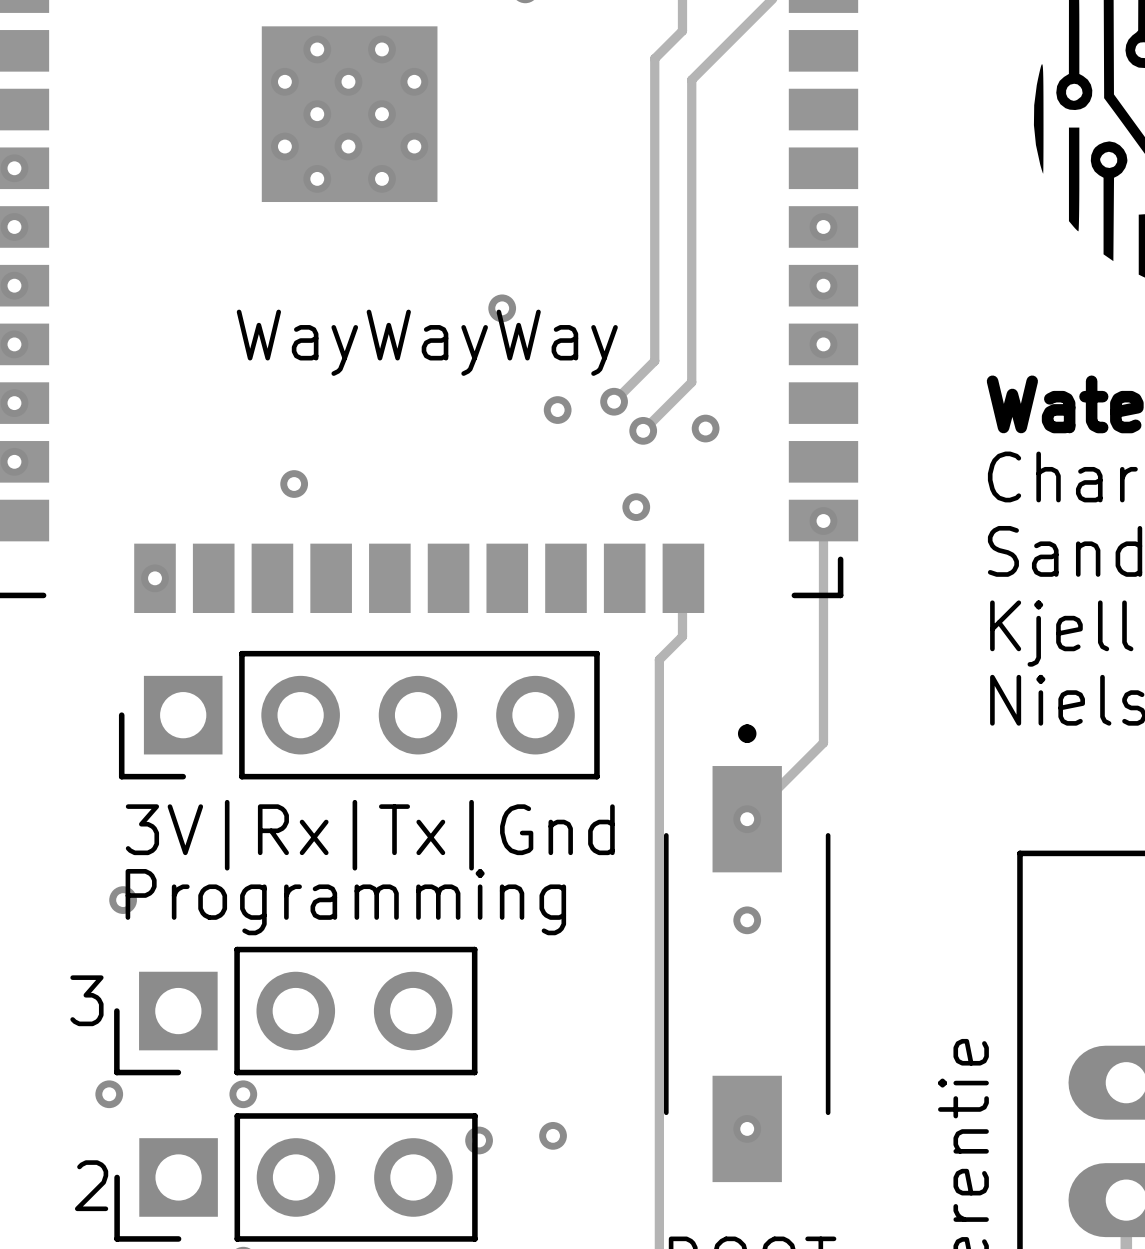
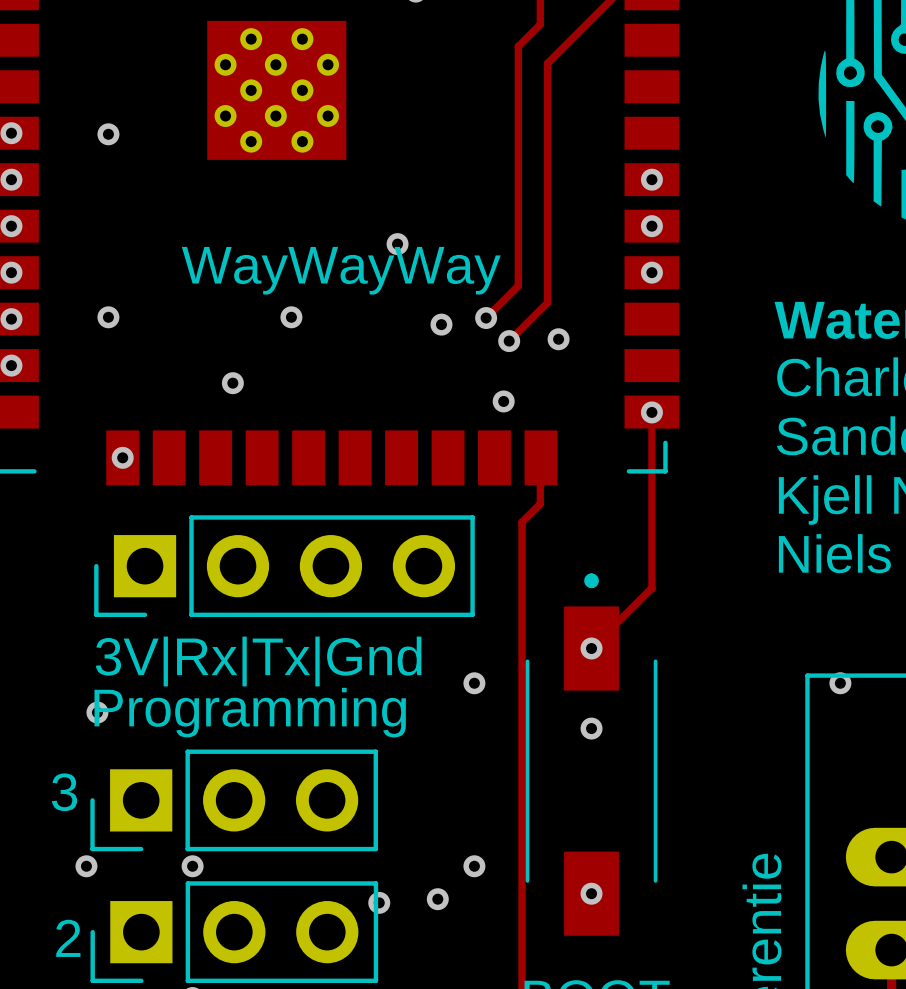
via: none -> (108, 134)
via: none -> (108, 317)
via: none -> (291, 317)
via: none -> (474, 683)
via: none -> (840, 683)
via: none -> (474, 866)

